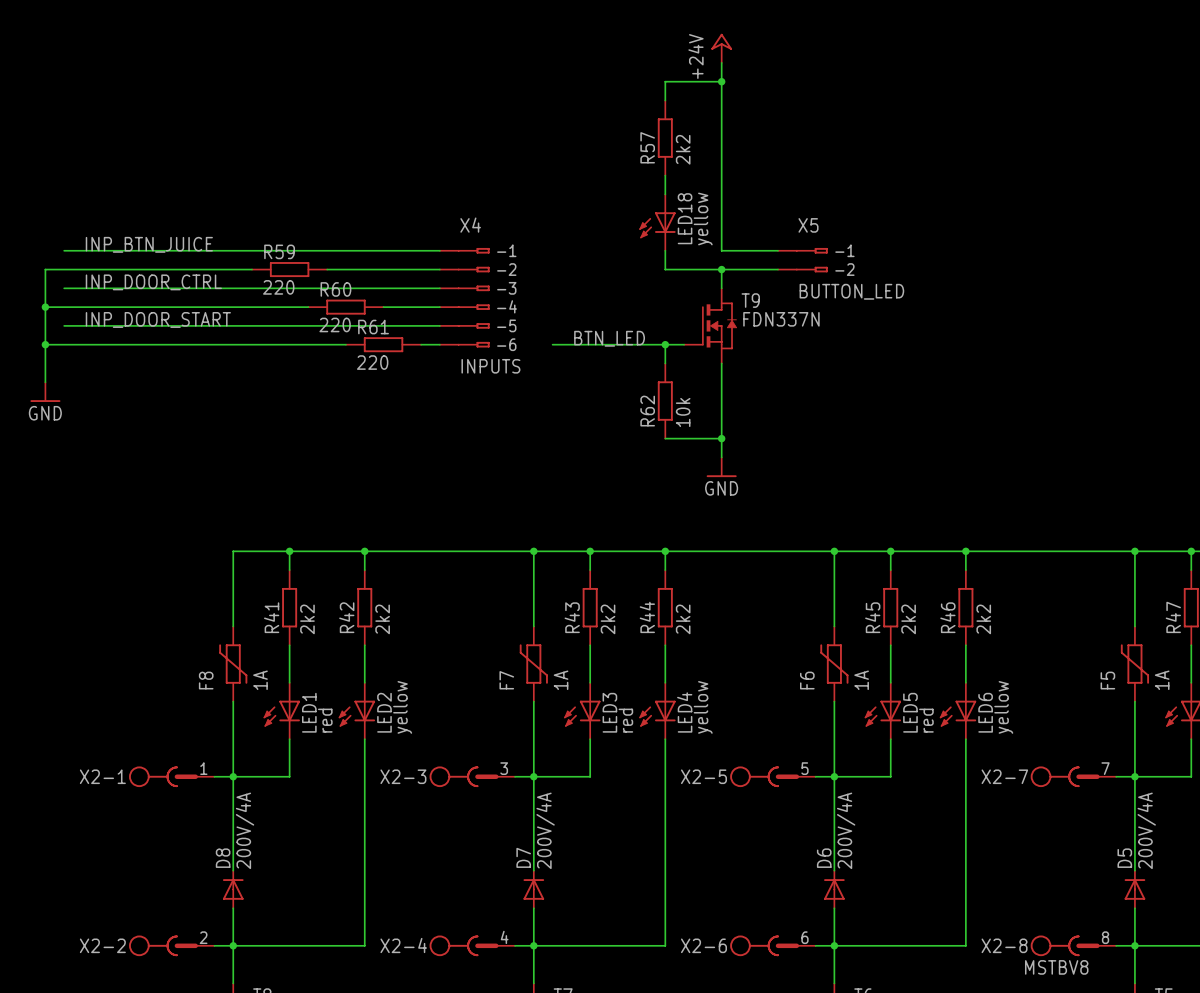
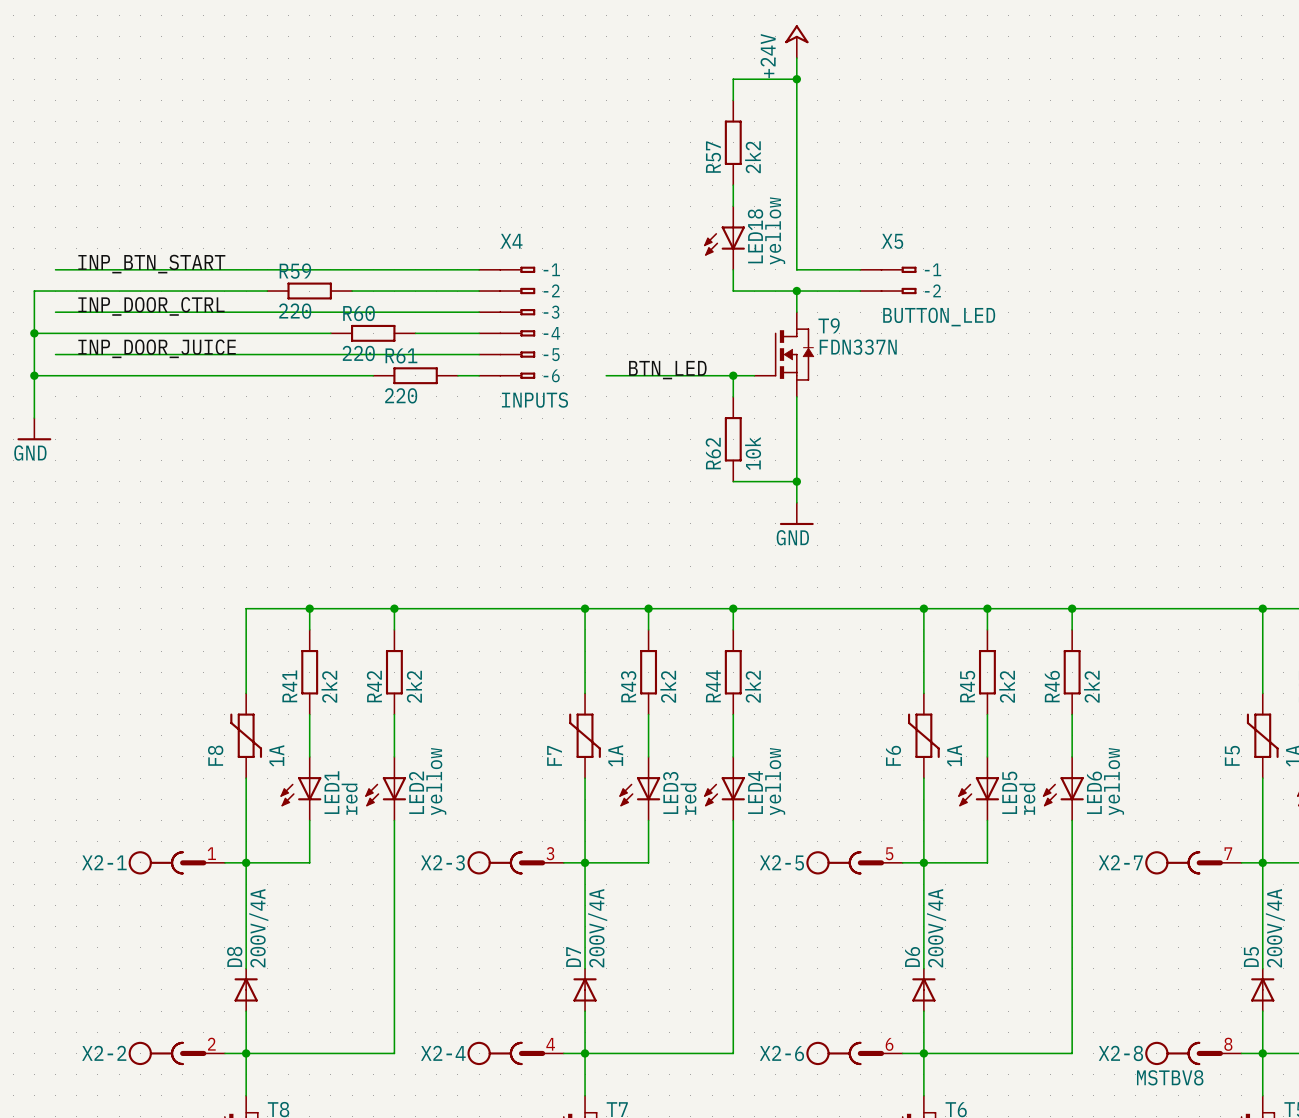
label: INP_BTN_JUICE (149, 244) -> INP_BTN_START (151, 264)
label: INP_DOOR_START (158, 319) -> INP_DOOR_JUICE (157, 348)

